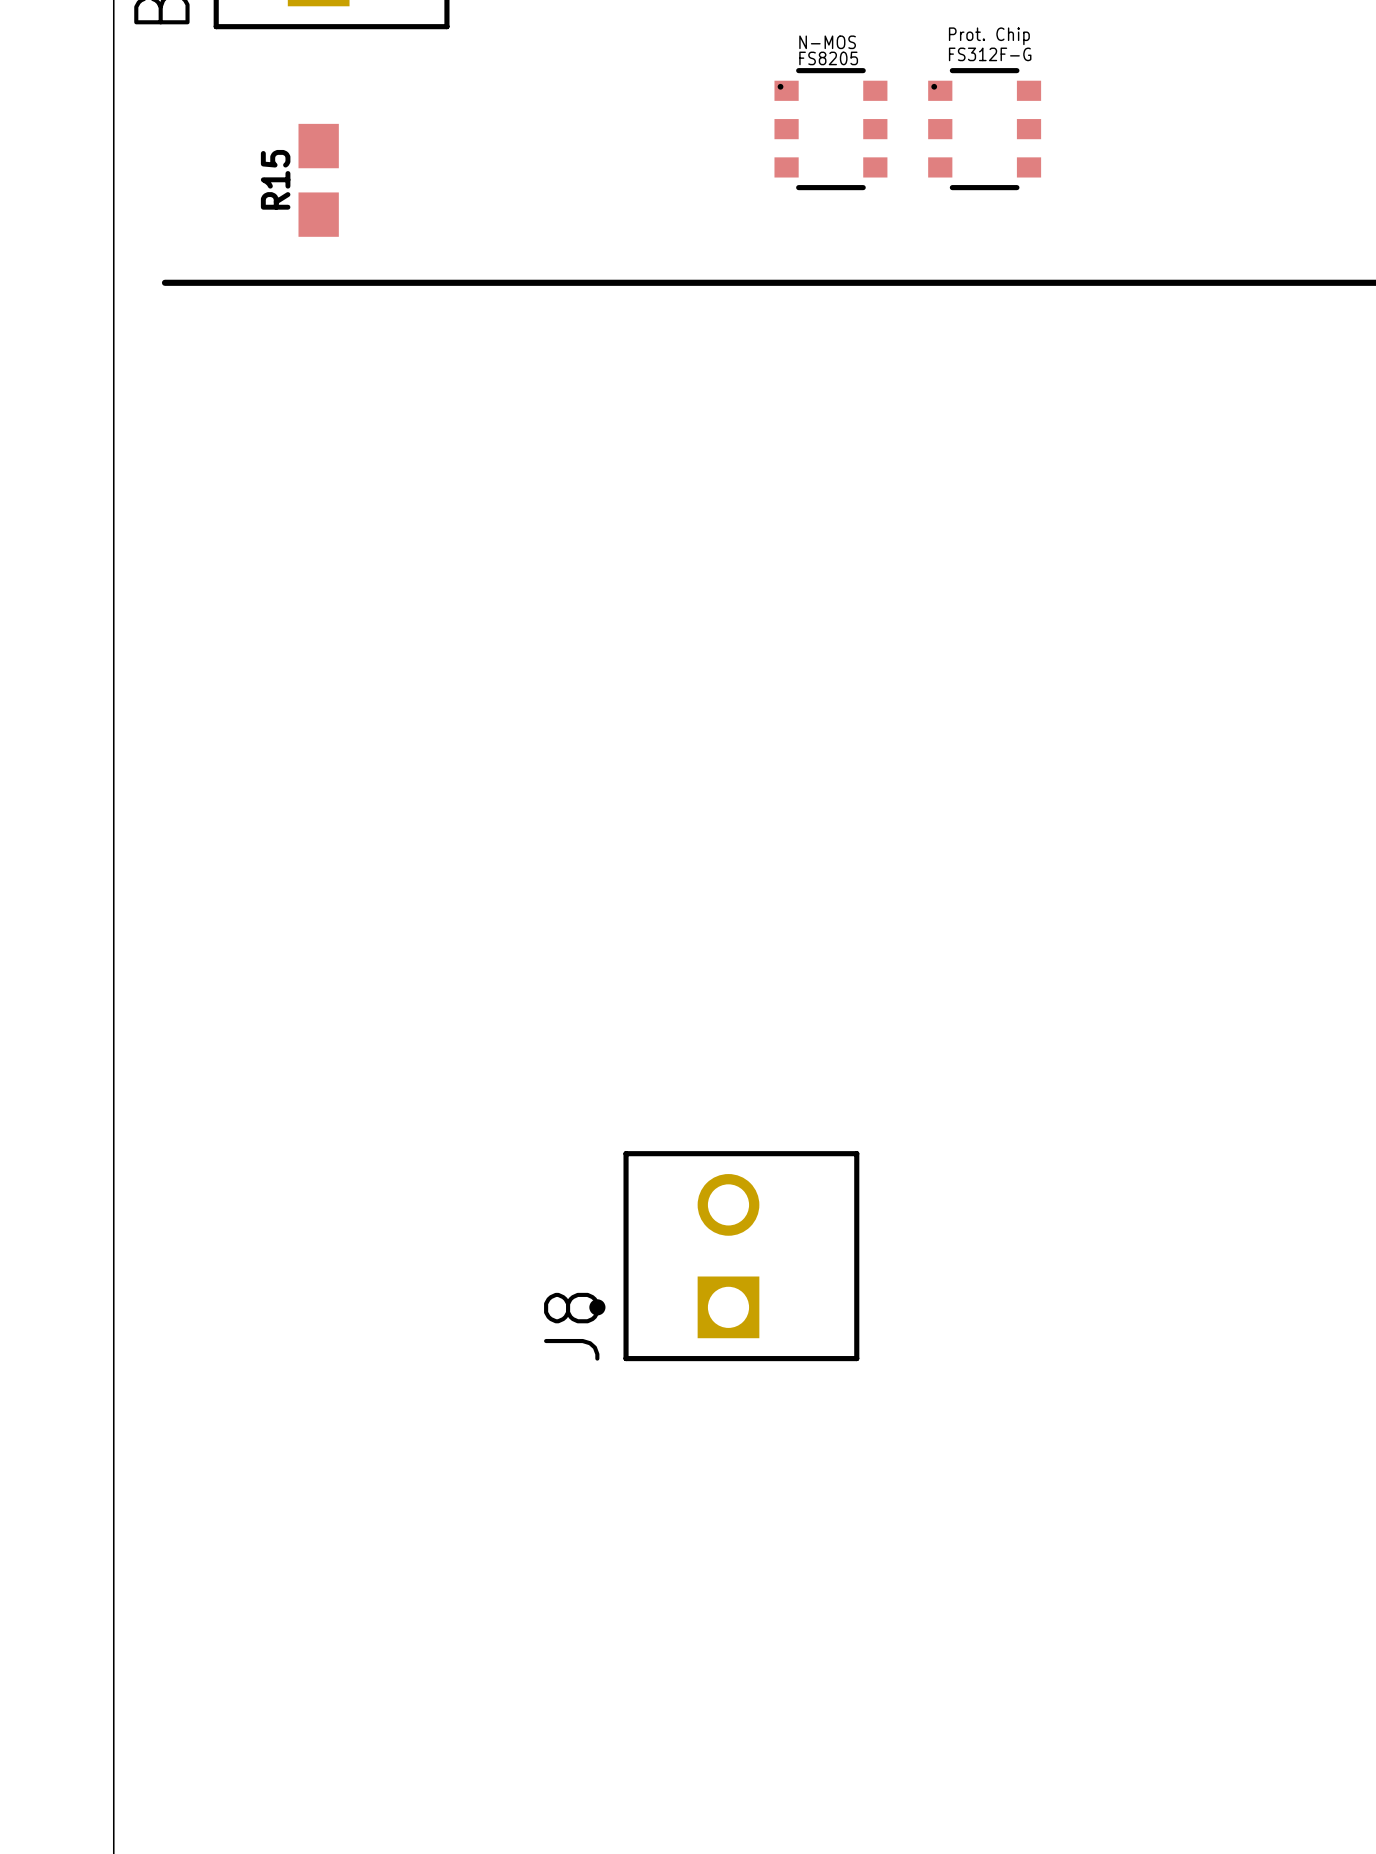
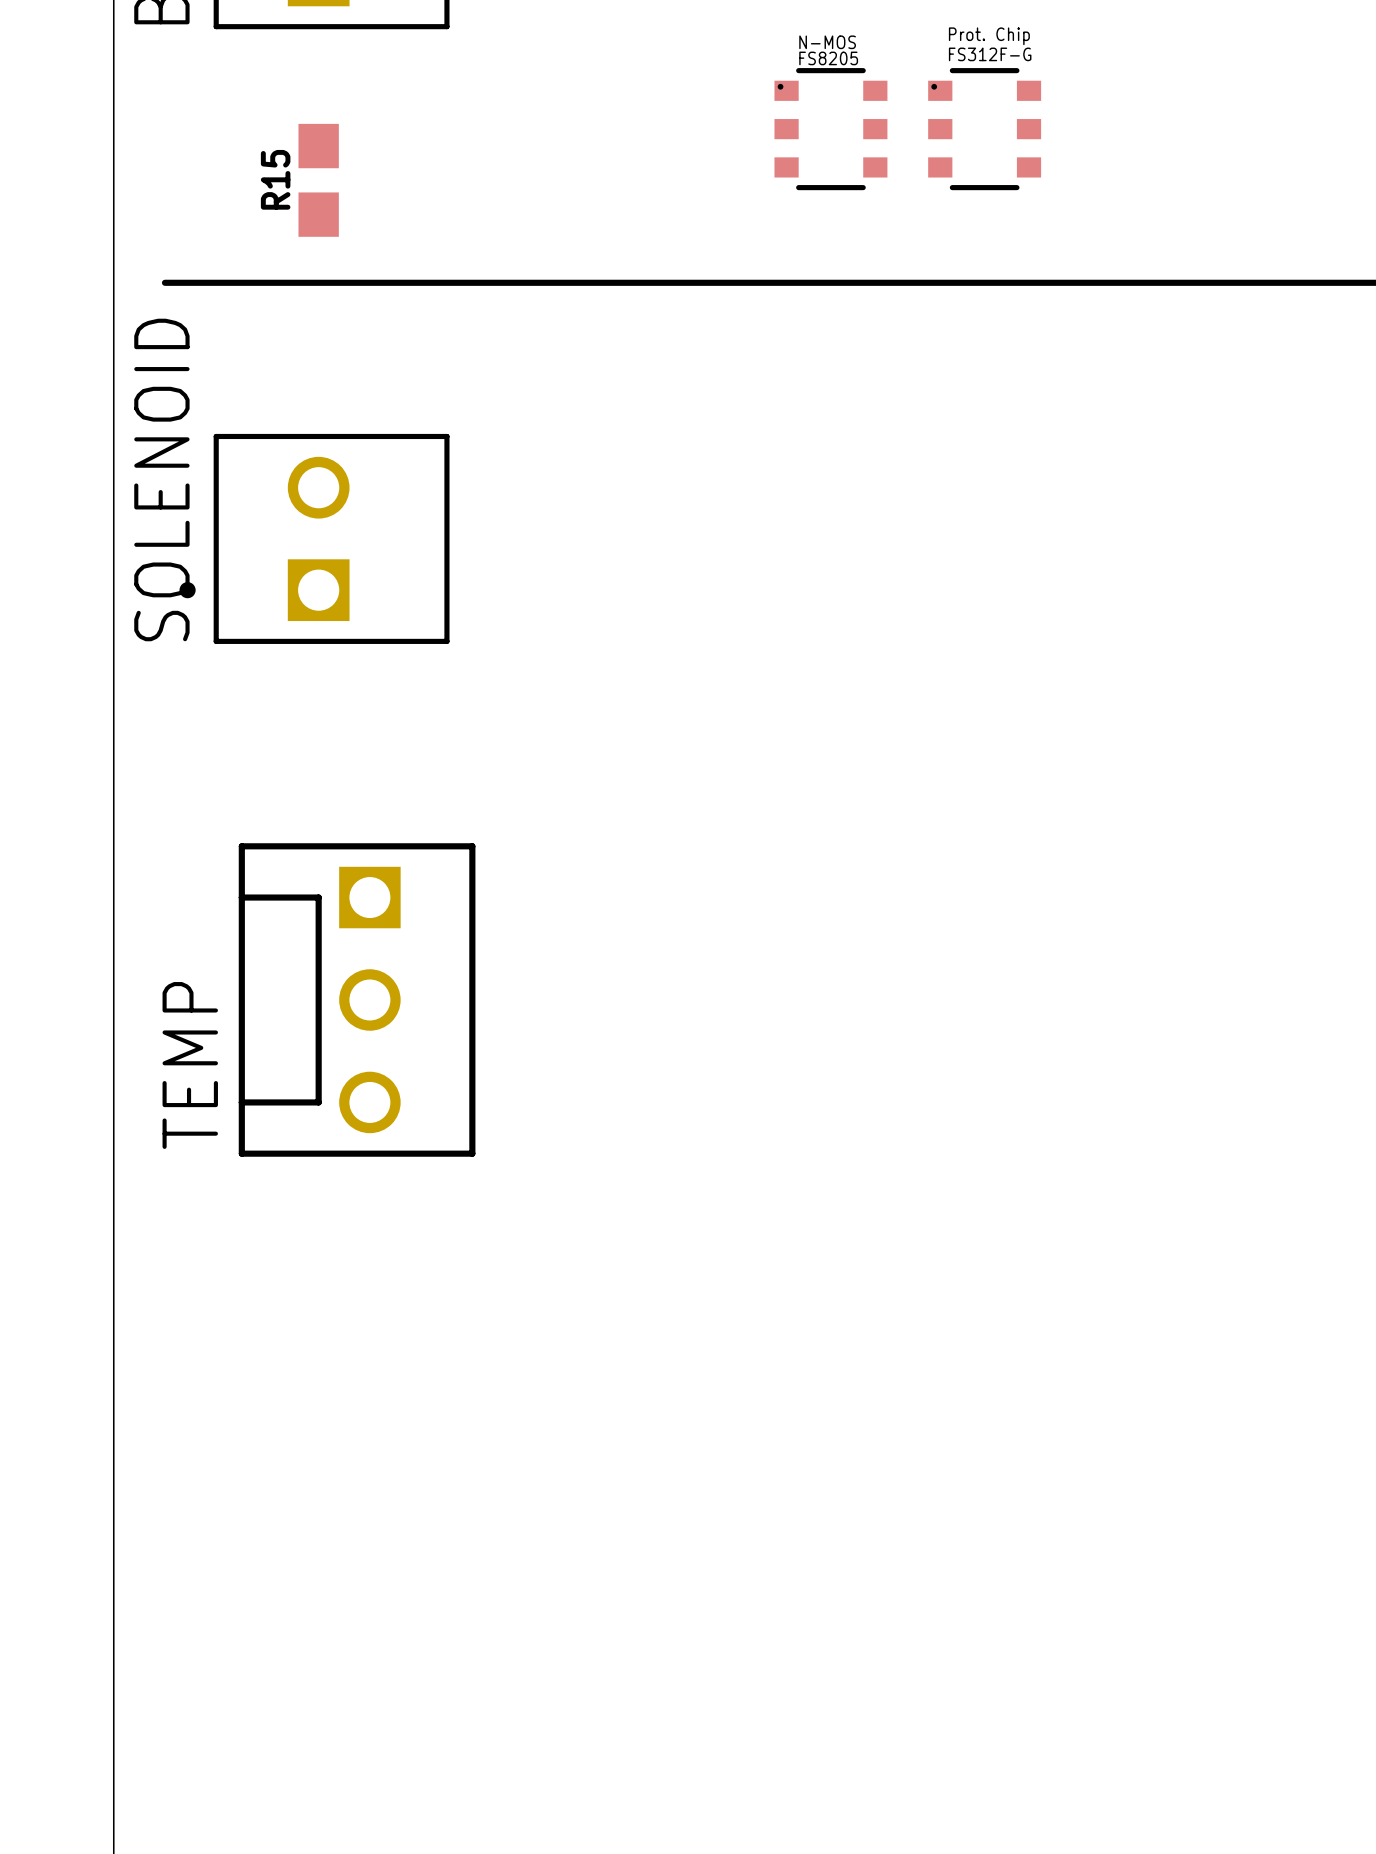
SOLENOID: none -> (314, 538)
TEMP: none -> (357, 999)
J8: (724, 1256) -> none

